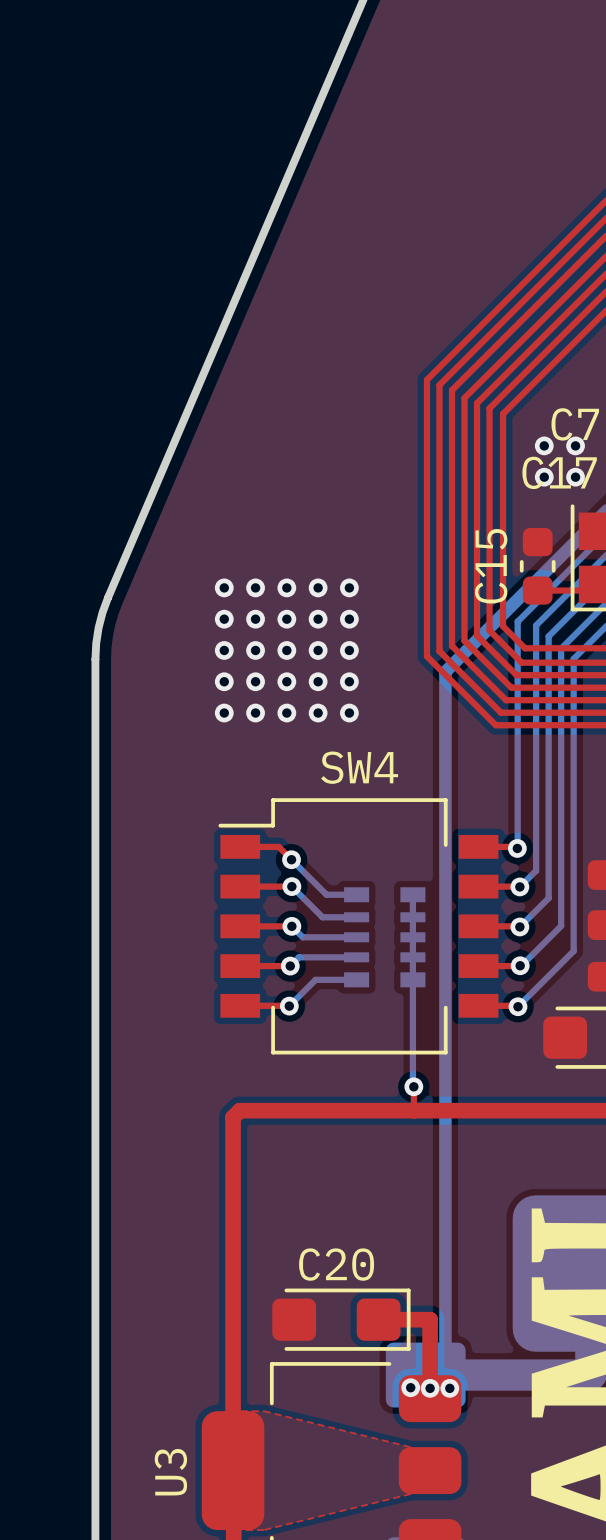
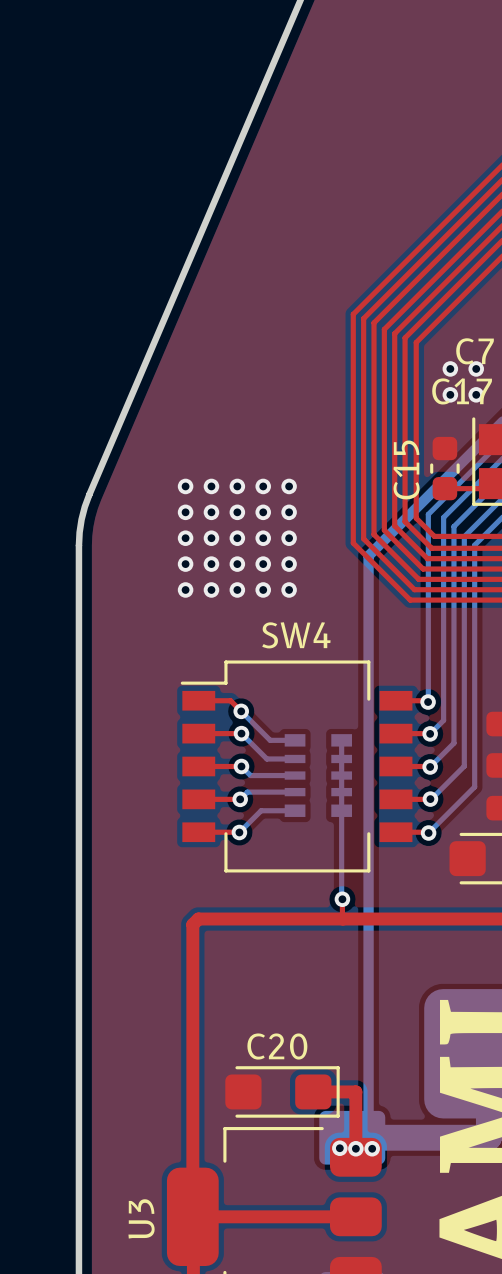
top zone outline: (240, 1411) (264, 1411) (410, 1447) (410, 1494) (264, 1530) (241, 1530) (240, 1411) -> none
top track: none -> (192, 1216) (355, 1216)

